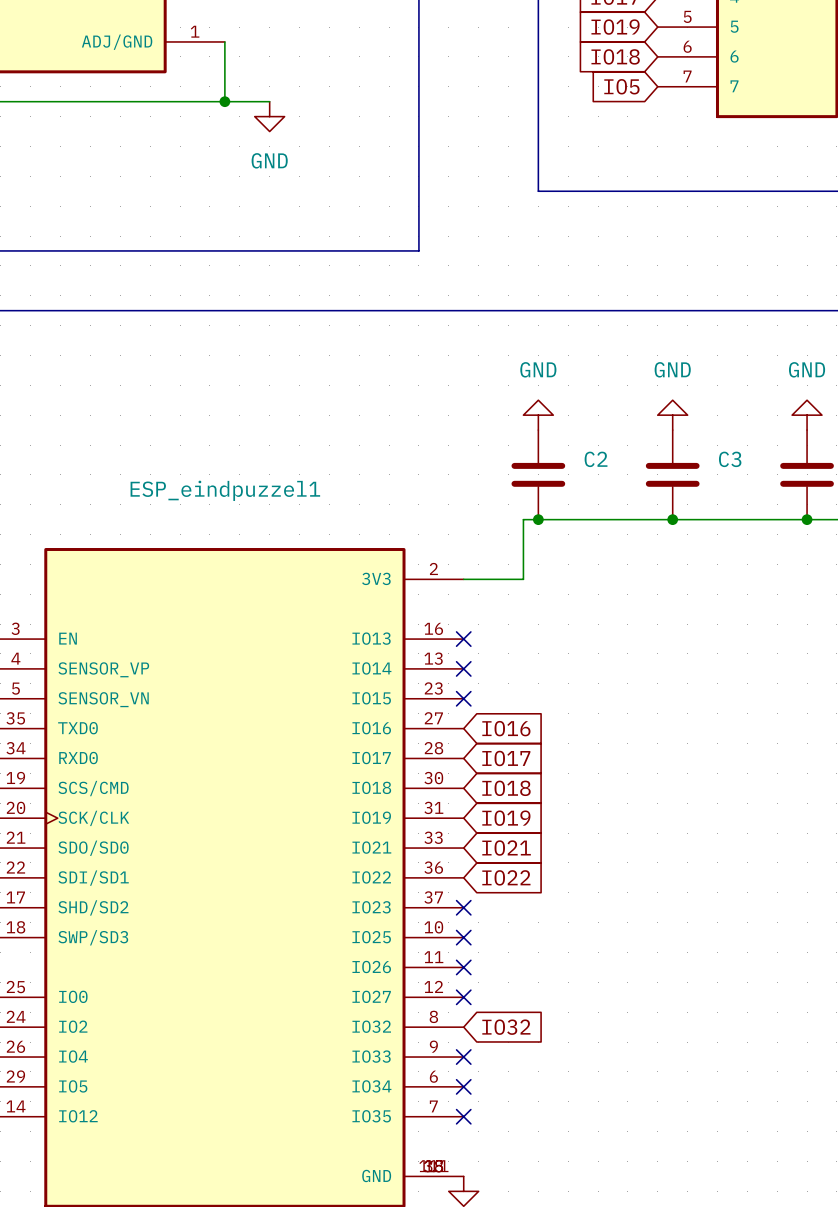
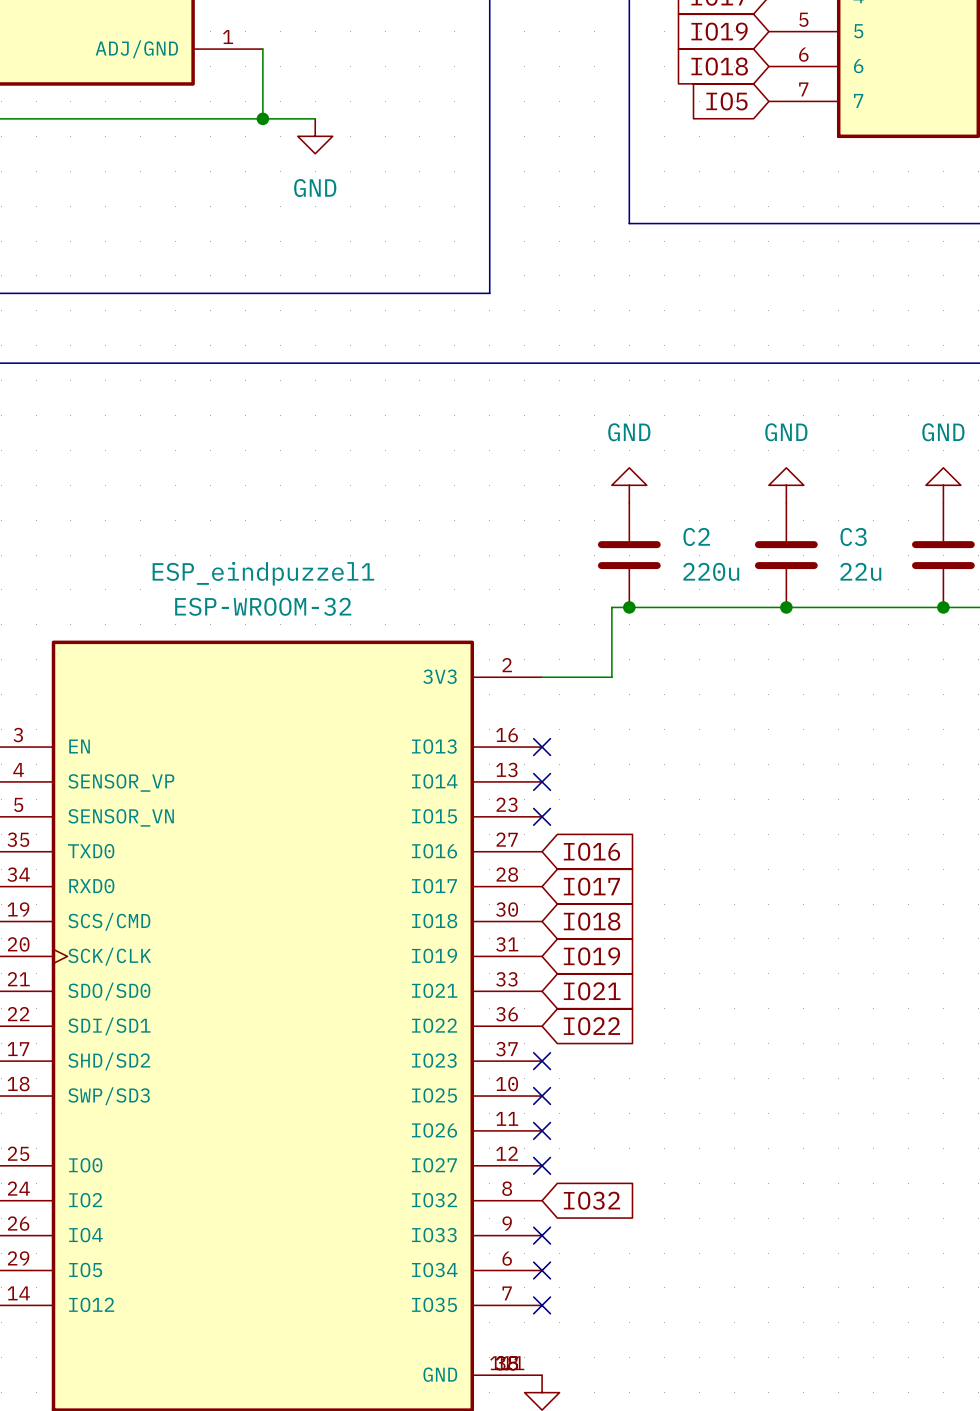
C2 value: none -> 220u (711, 571)
C3 value: none -> 22u (860, 571)
ESP_eindpuzzel1 value: none -> ESP-WROOM-32 (263, 606)

